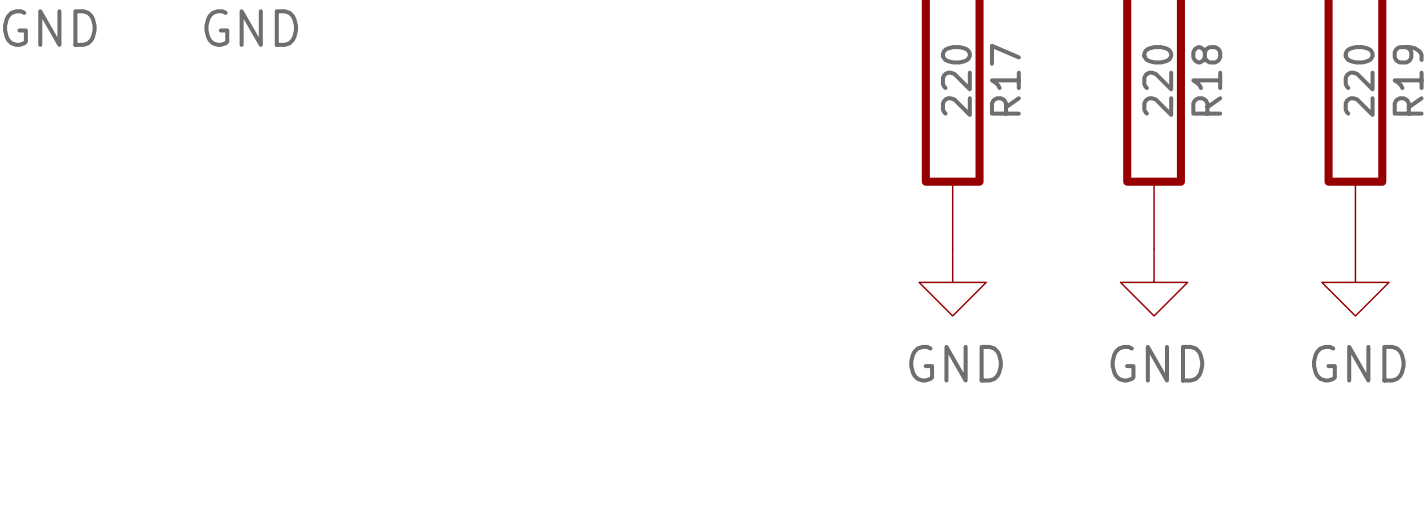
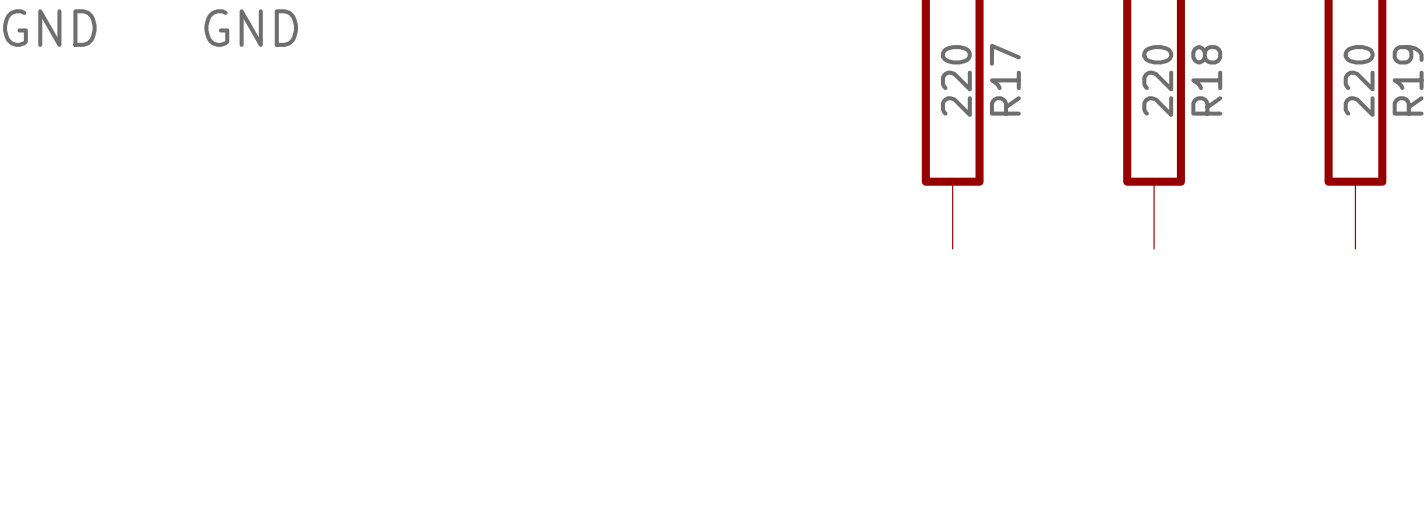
power symbol: GND (952, 282) -> none
power symbol: GND (1154, 282) -> none
power symbol: GND (1355, 282) -> none

